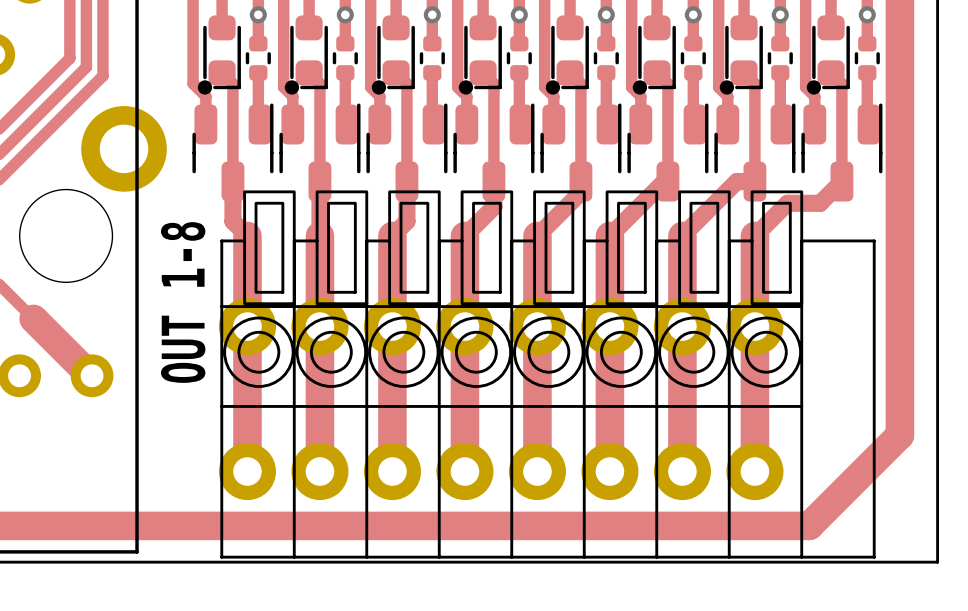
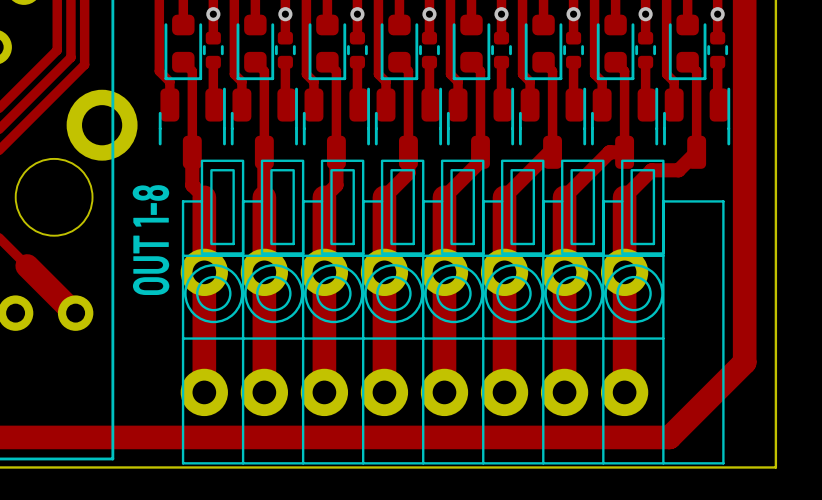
part footprint: [197, 15, 241, 95] -> [164, 14, 203, 81]
part footprint: [284, 15, 328, 95] -> [236, 14, 275, 81]
part footprint: [371, 15, 415, 95] -> [308, 14, 347, 81]
part footprint: [458, 15, 502, 95] -> [380, 14, 419, 81]
part footprint: [545, 15, 589, 95] -> [452, 14, 491, 81]
part footprint: [632, 15, 676, 95] -> [524, 14, 563, 81]
part footprint: [719, 15, 763, 95] -> [596, 14, 635, 81]
part footprint: [806, 15, 850, 95] -> [668, 14, 707, 81]

